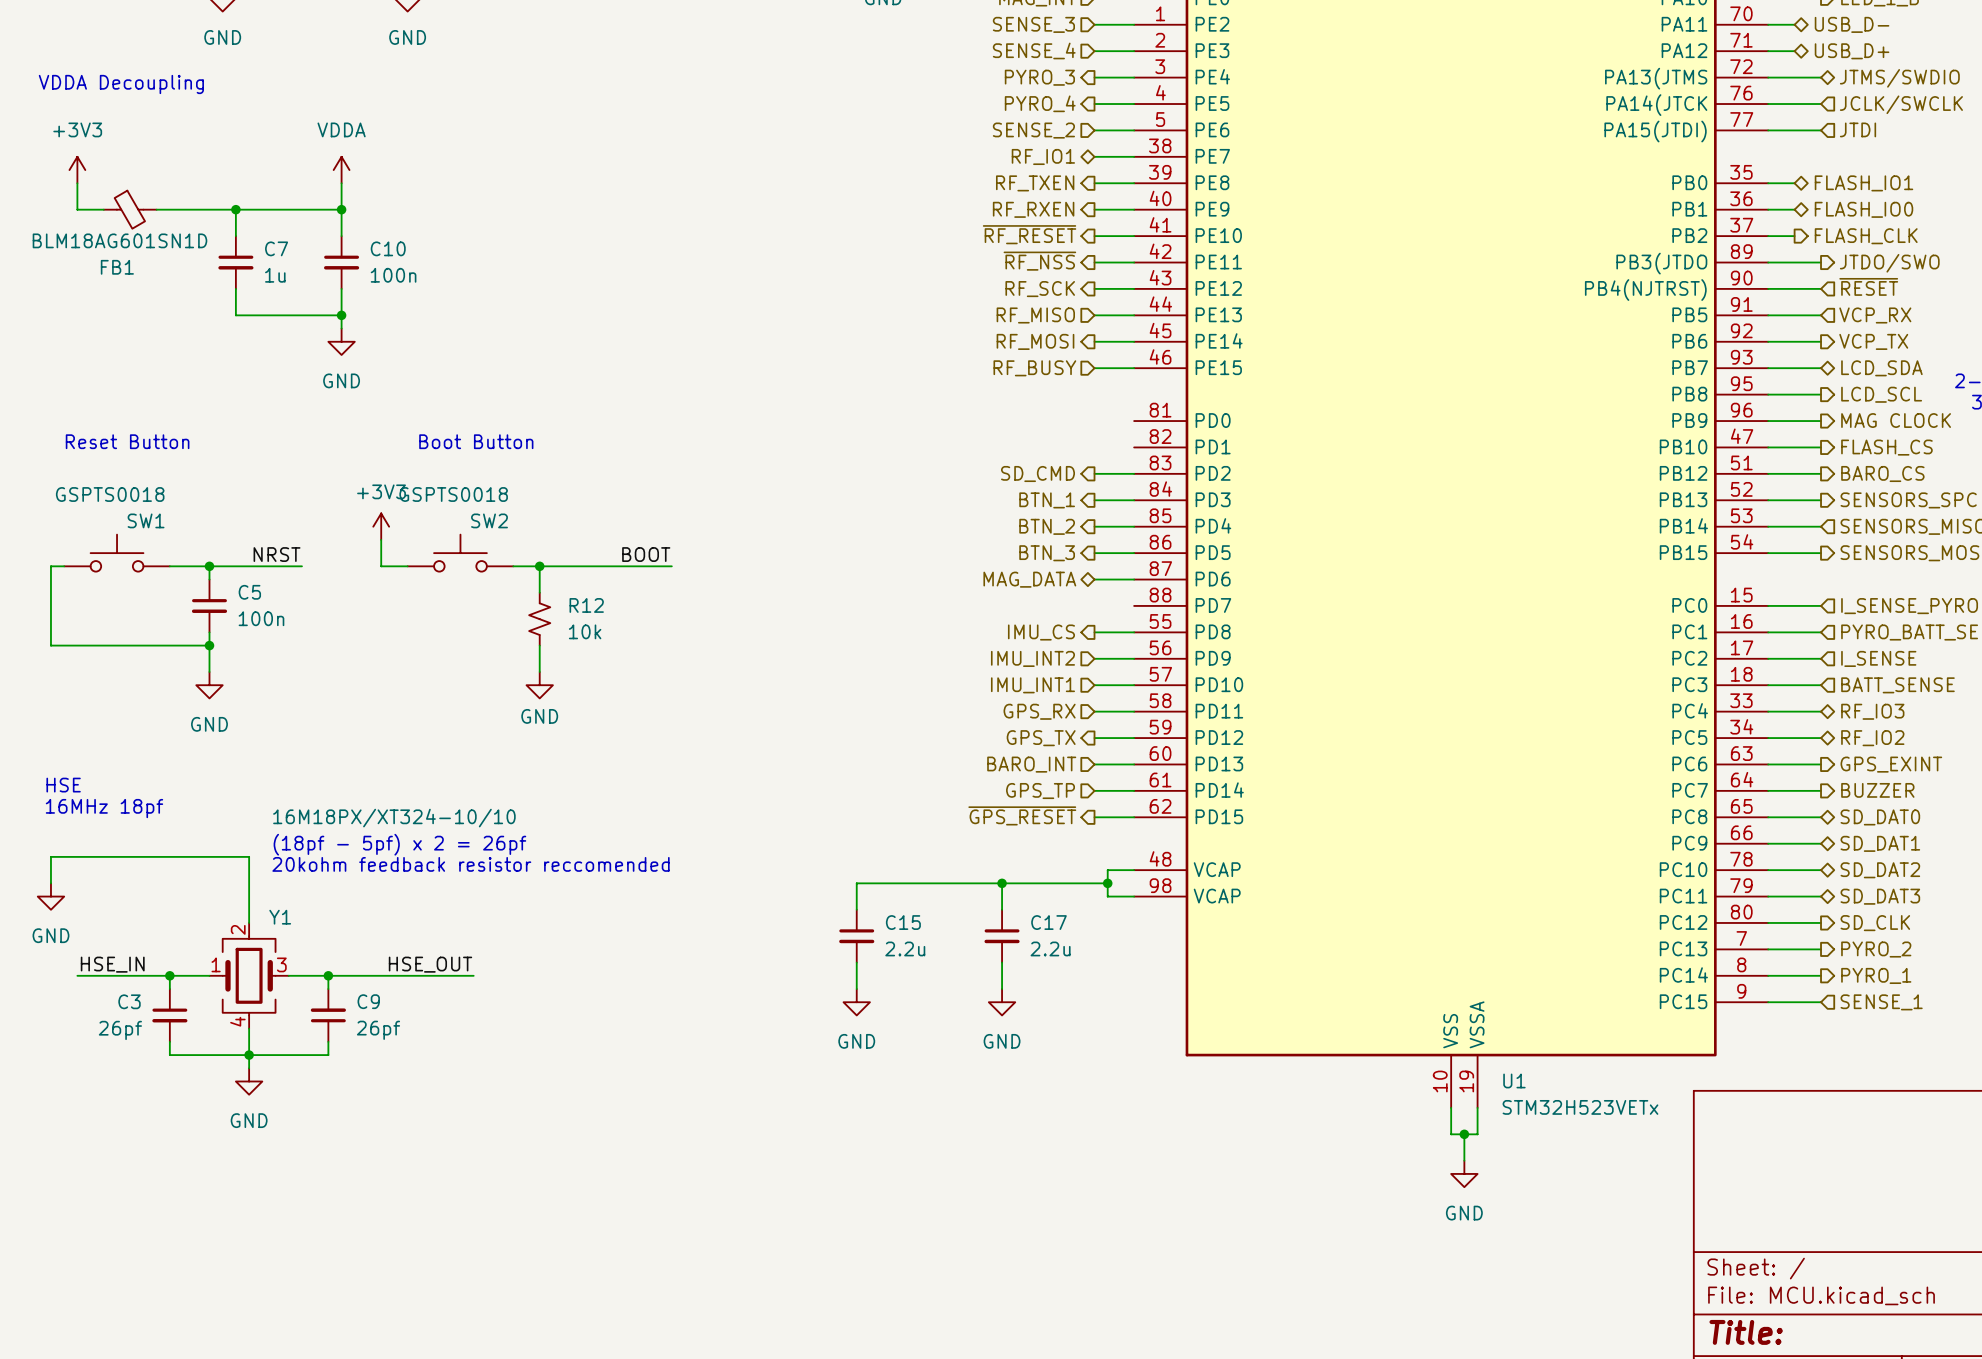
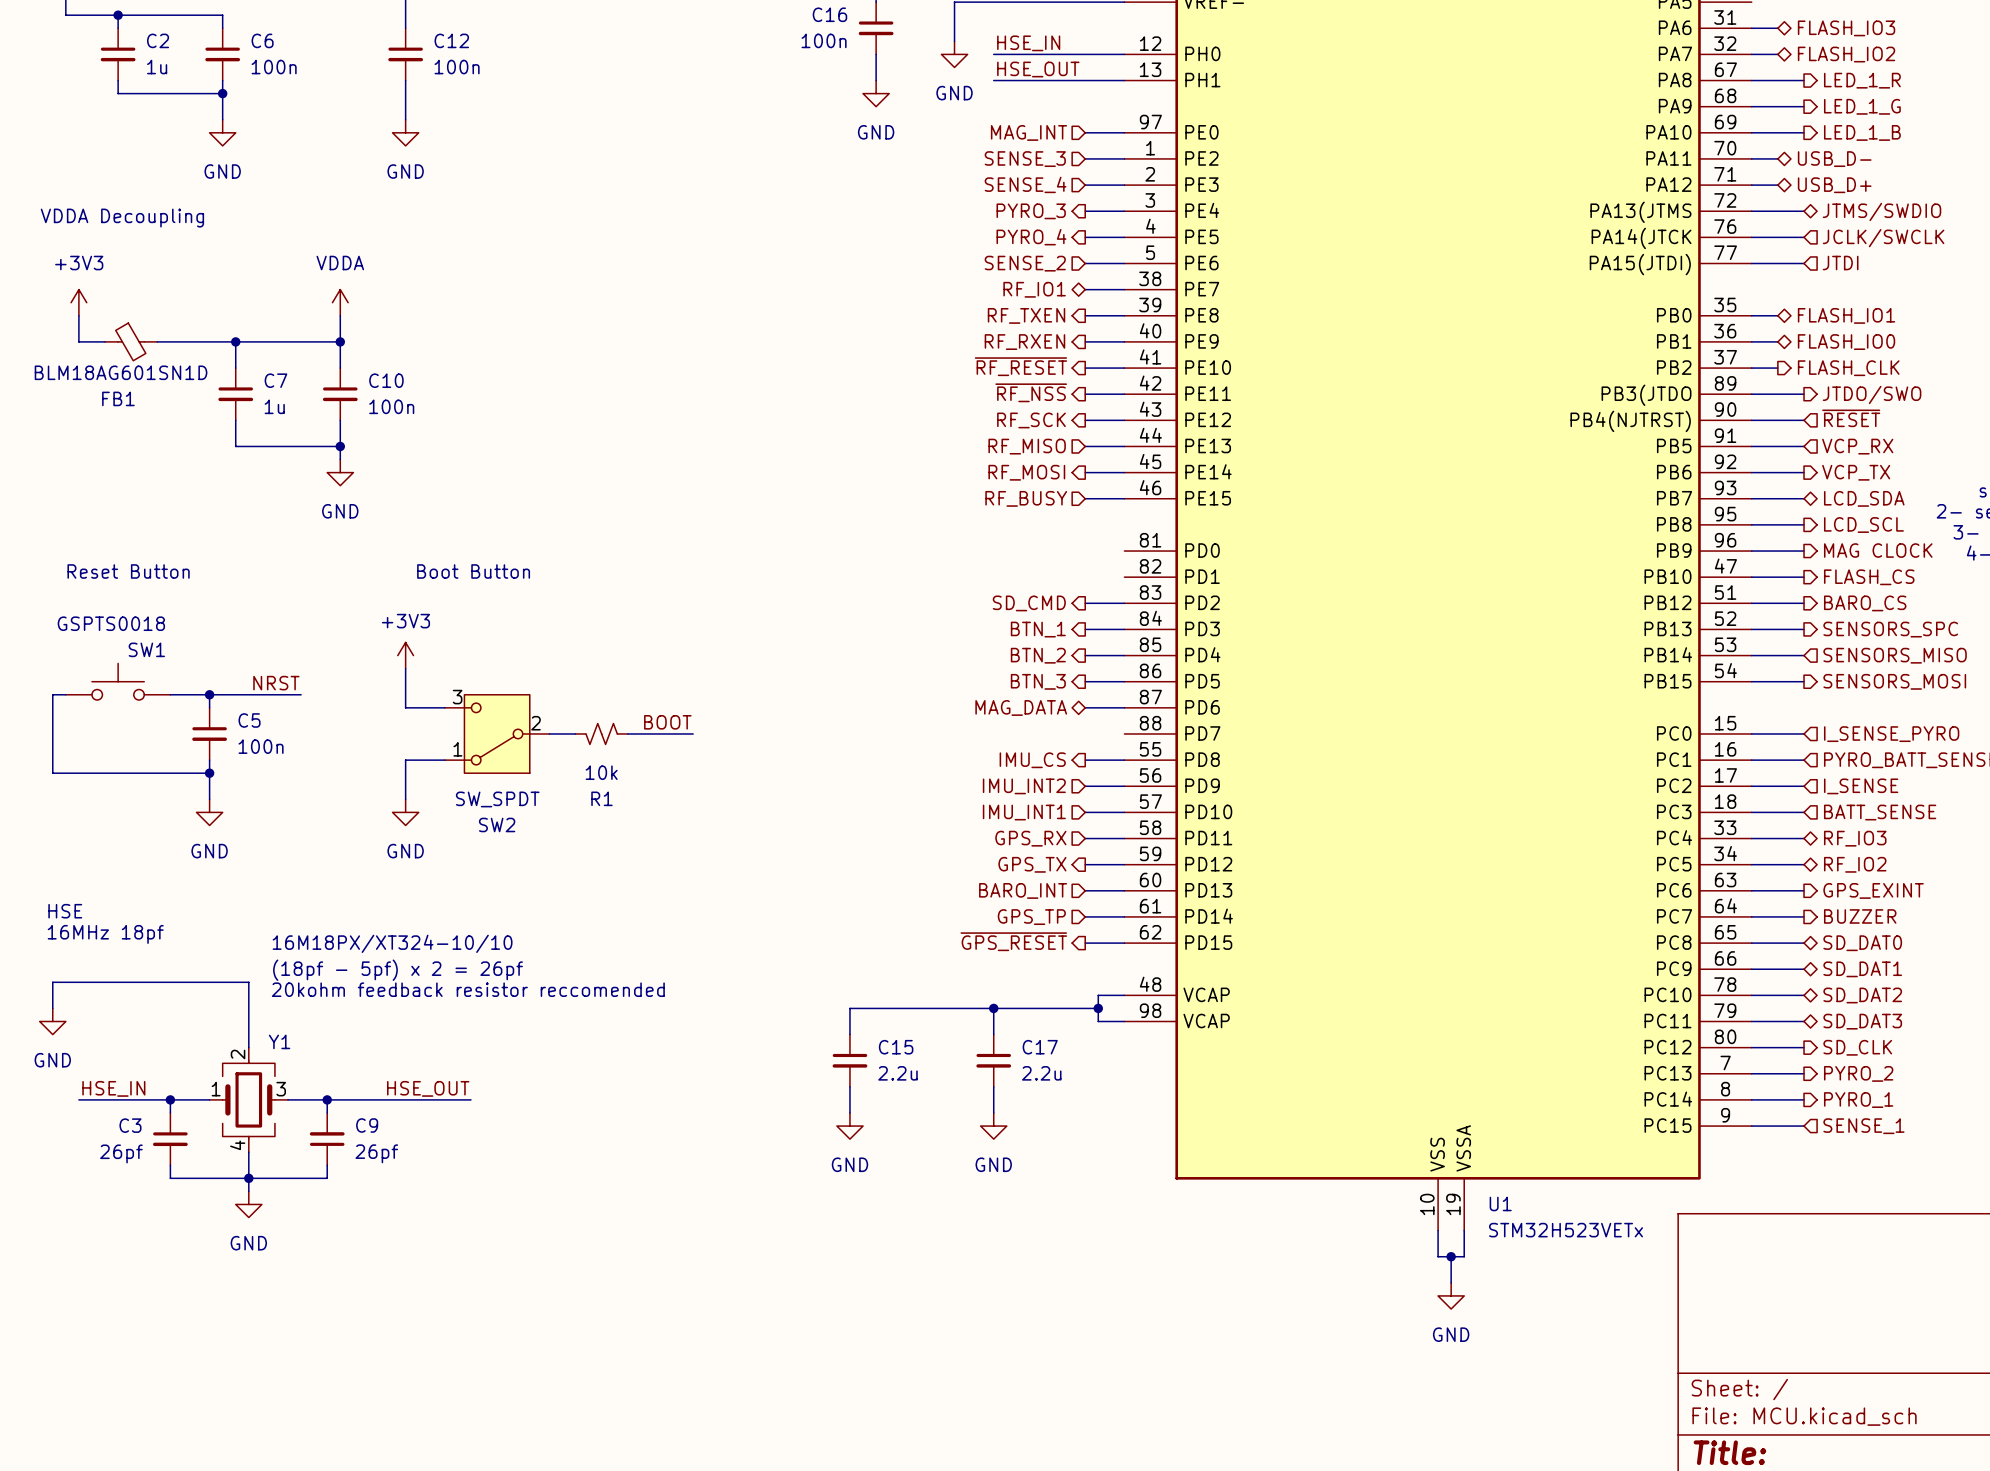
SW2 value: GSPTS0018 (453, 494) -> SW_SPDT (497, 799)
SW2 name position: SW2 (489, 520) -> SW2 (497, 824)
power symbol position: +3V3 (381, 526) -> +3V3 (405, 655)
SW2 symbol: [407, 534, 514, 572] -> [444, 694, 550, 774]
wire: (381, 539) (381, 566) (407, 566) -> none
wire: none -> (405, 668) (405, 707) (444, 707)
label position: BOOT (646, 554) -> BOOT (667, 722)
wire: (513, 566) (671, 566) -> none
wire: (539, 566) (539, 592) -> none
junction: (539, 566) -> none
wire: none -> (549, 733) (575, 733)
R1: none -> 10k (601, 733)
wire: none -> (627, 733) (693, 733)
R12: 10k (539, 619) -> none
wire: none -> (444, 760) (405, 760) (405, 799)
wire: (539, 645) (539, 672) -> none
power symbol position: GND (539, 685) -> GND (405, 812)
power symbol text position: GND (539, 716) -> GND (405, 851)

